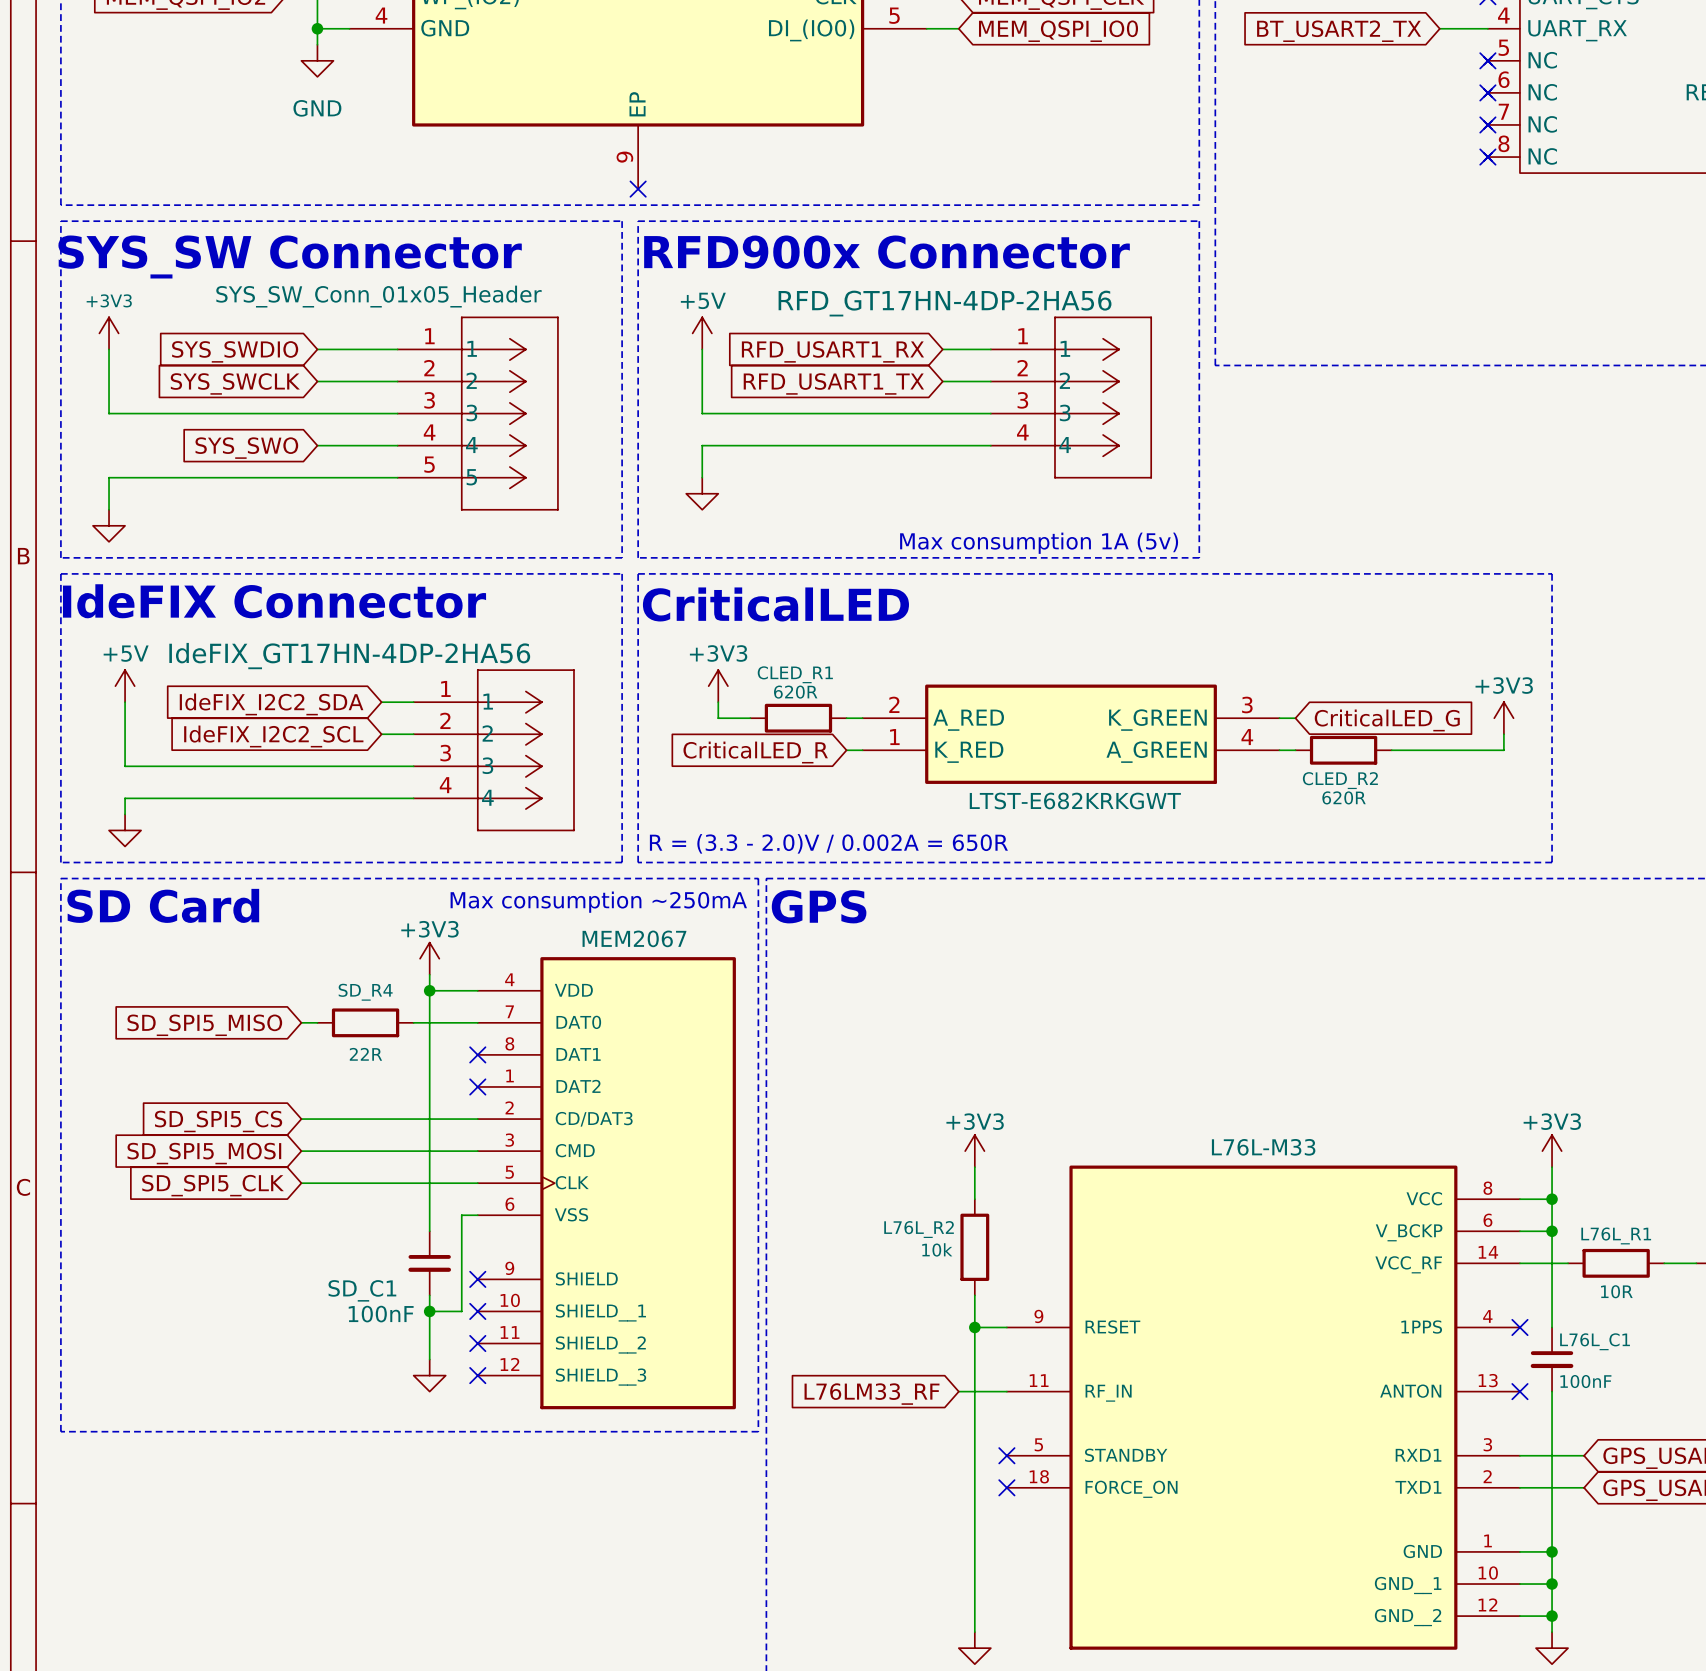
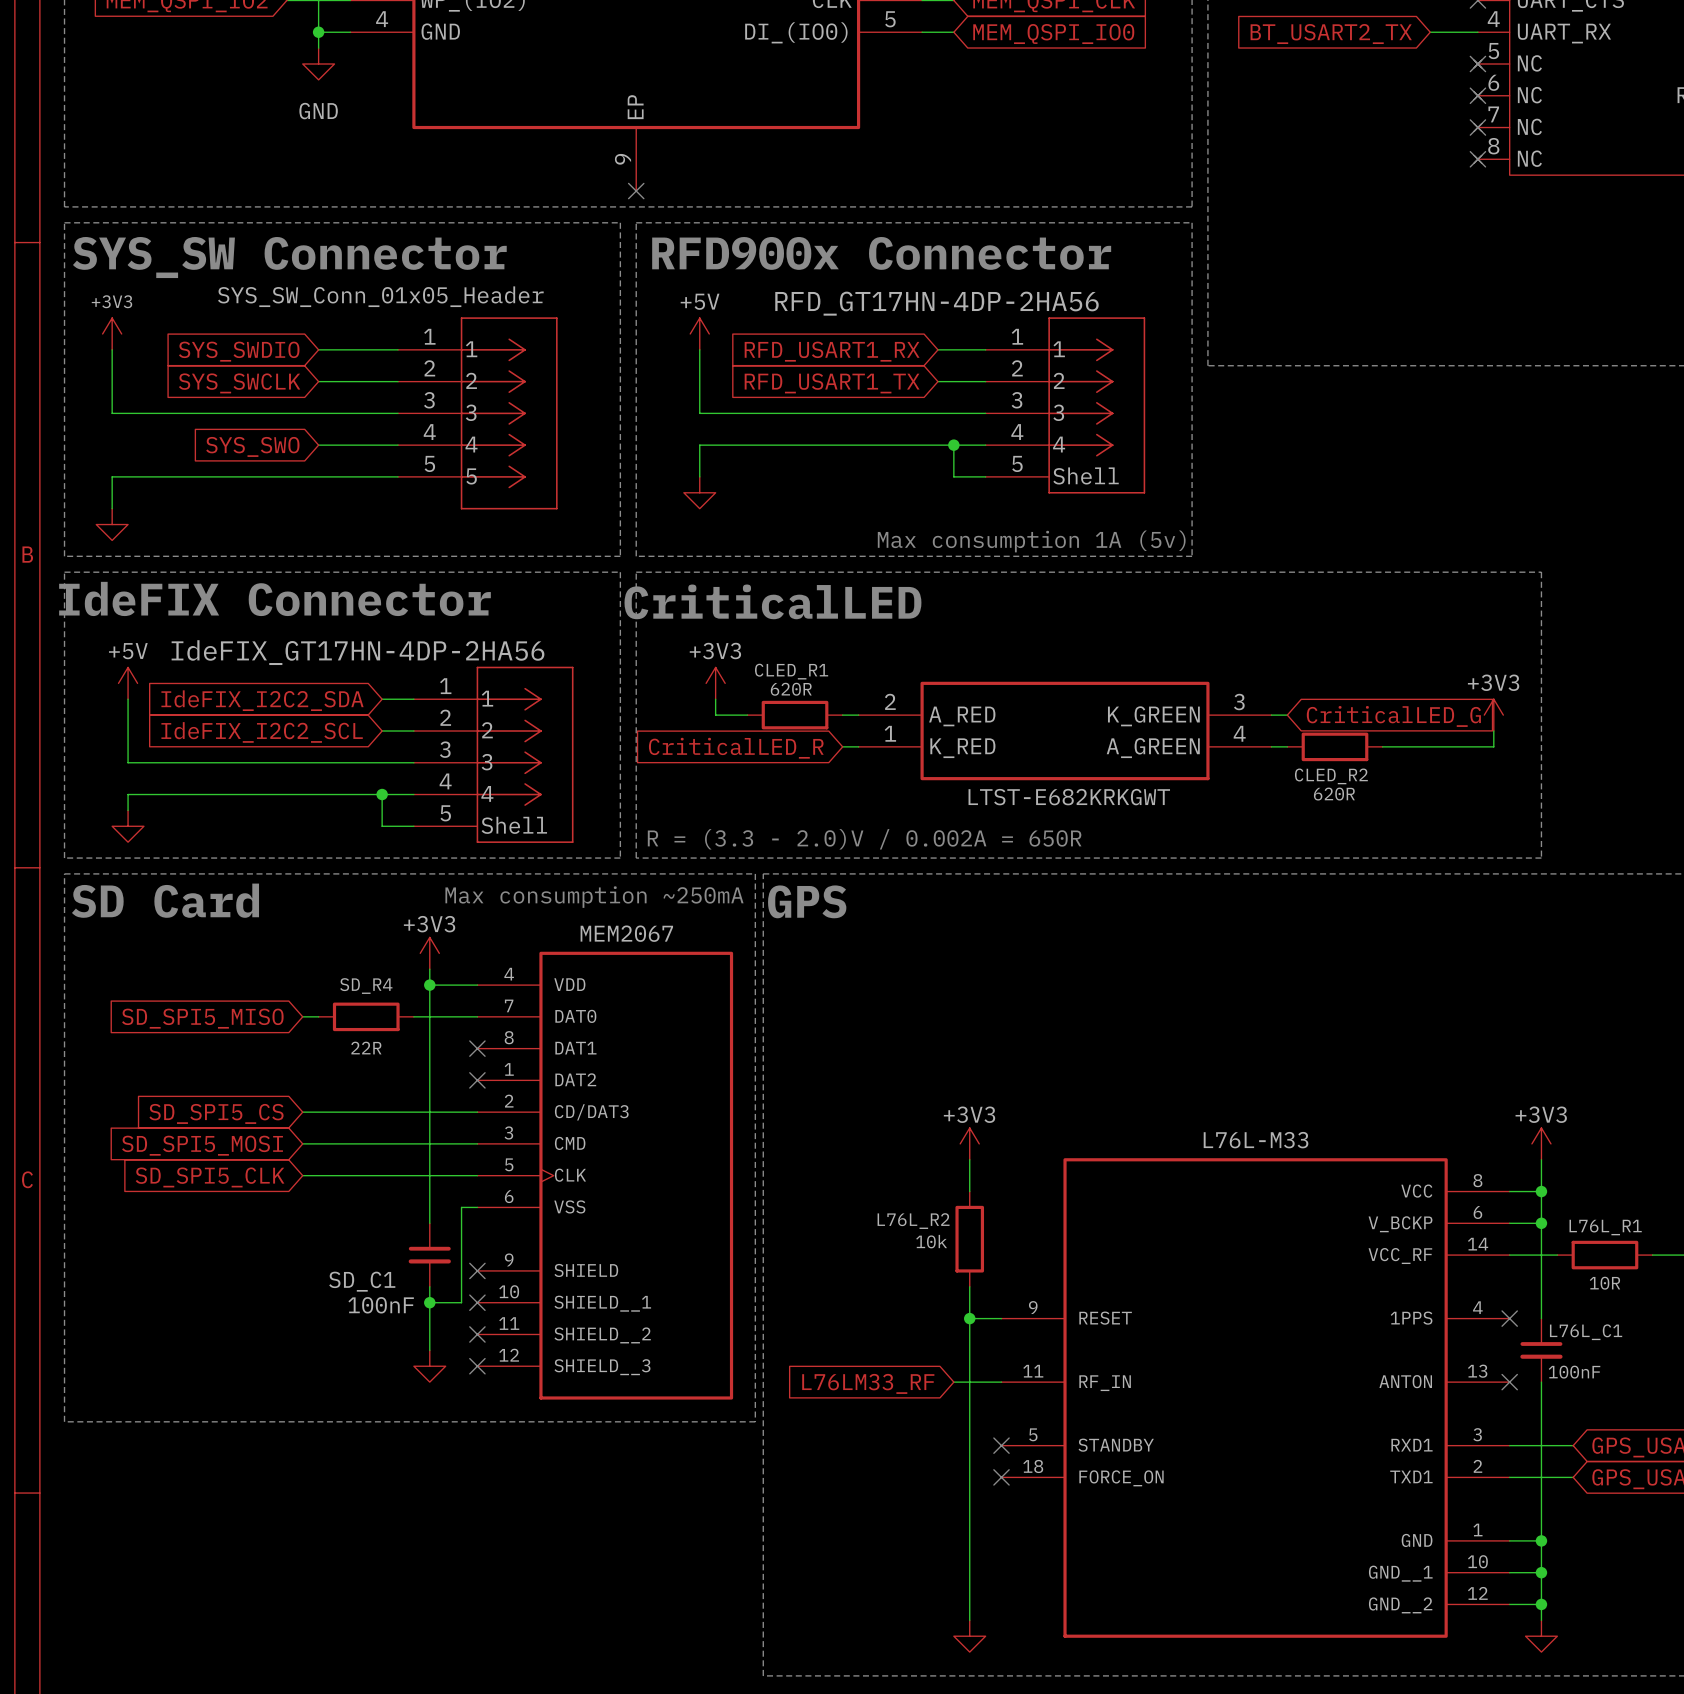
part symbol: [990, 316, 1152, 479] -> [985, 317, 1146, 494]
wire: none -> (953, 445) (953, 476) (985, 476)
junction: none -> (953, 445)
part symbol: [413, 669, 575, 832] -> [413, 666, 574, 843]
wire: none -> (382, 794) (382, 826) (413, 826)
junction: none -> (382, 794)

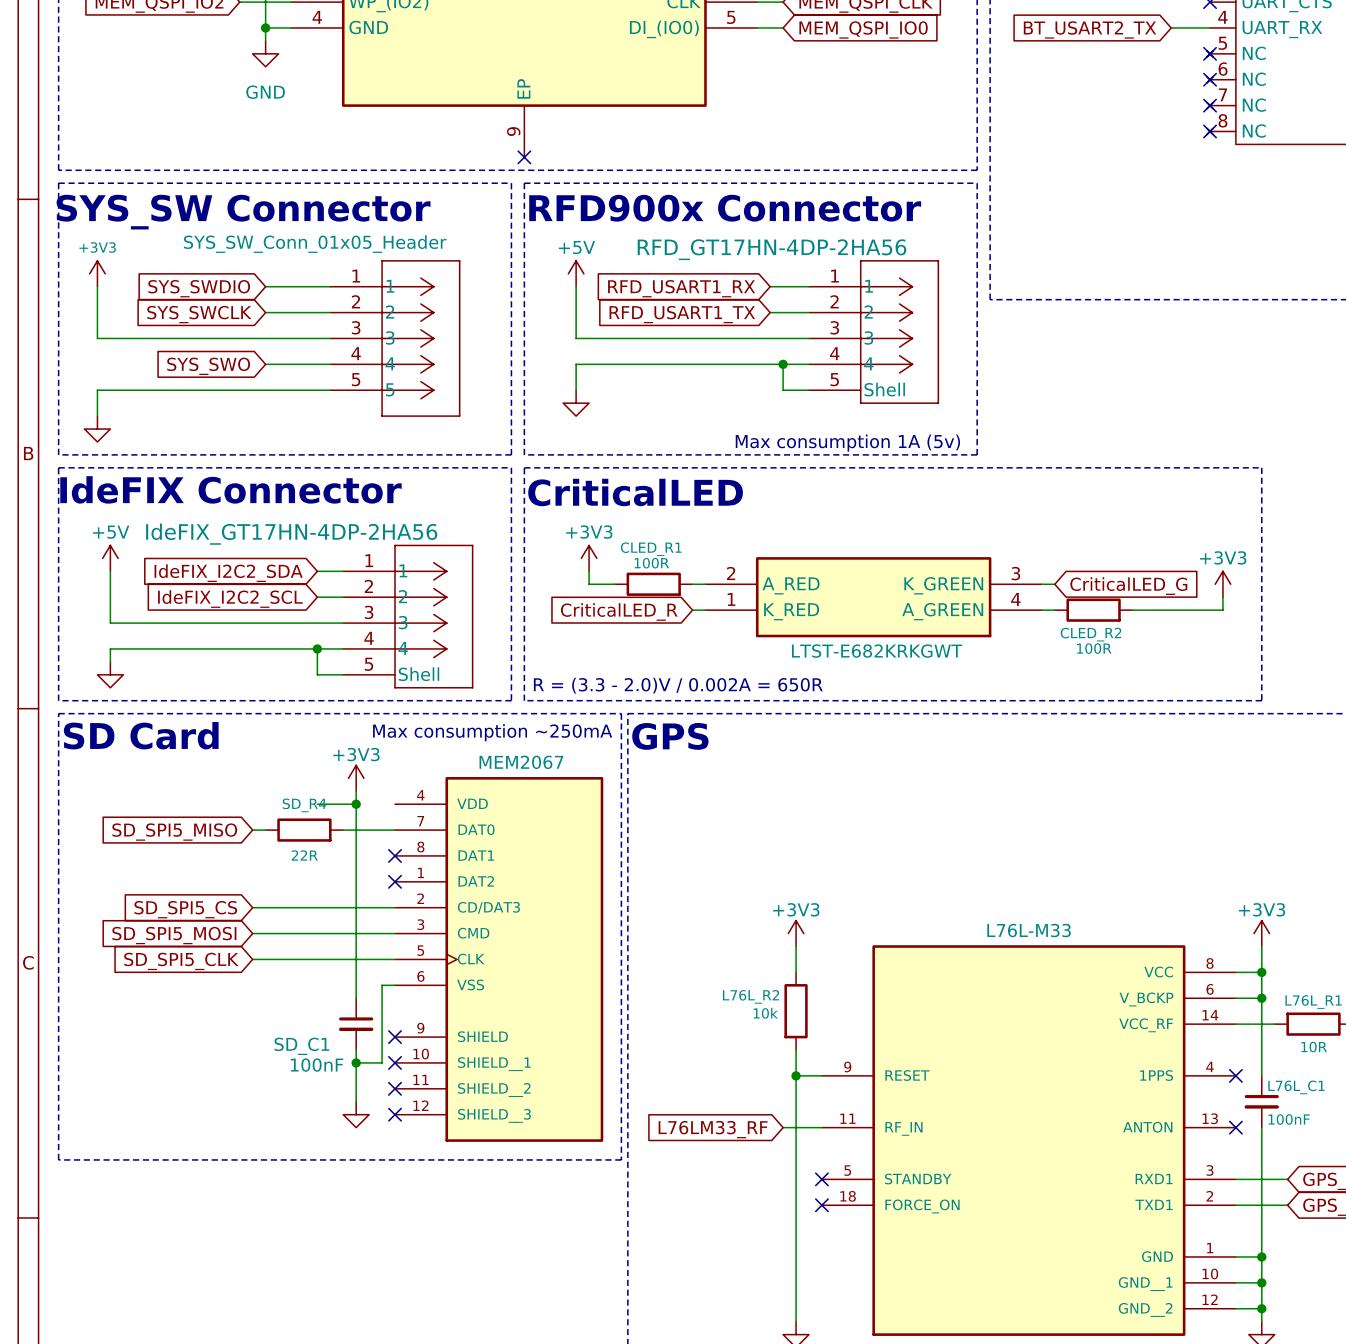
CLED_R1 value: 620R (791, 689) -> 100R (651, 563)
CLED_R2 value: 620R (1334, 794) -> 100R (1094, 648)
wire: (429, 985) (477, 985) -> (356, 804) (317, 804)

